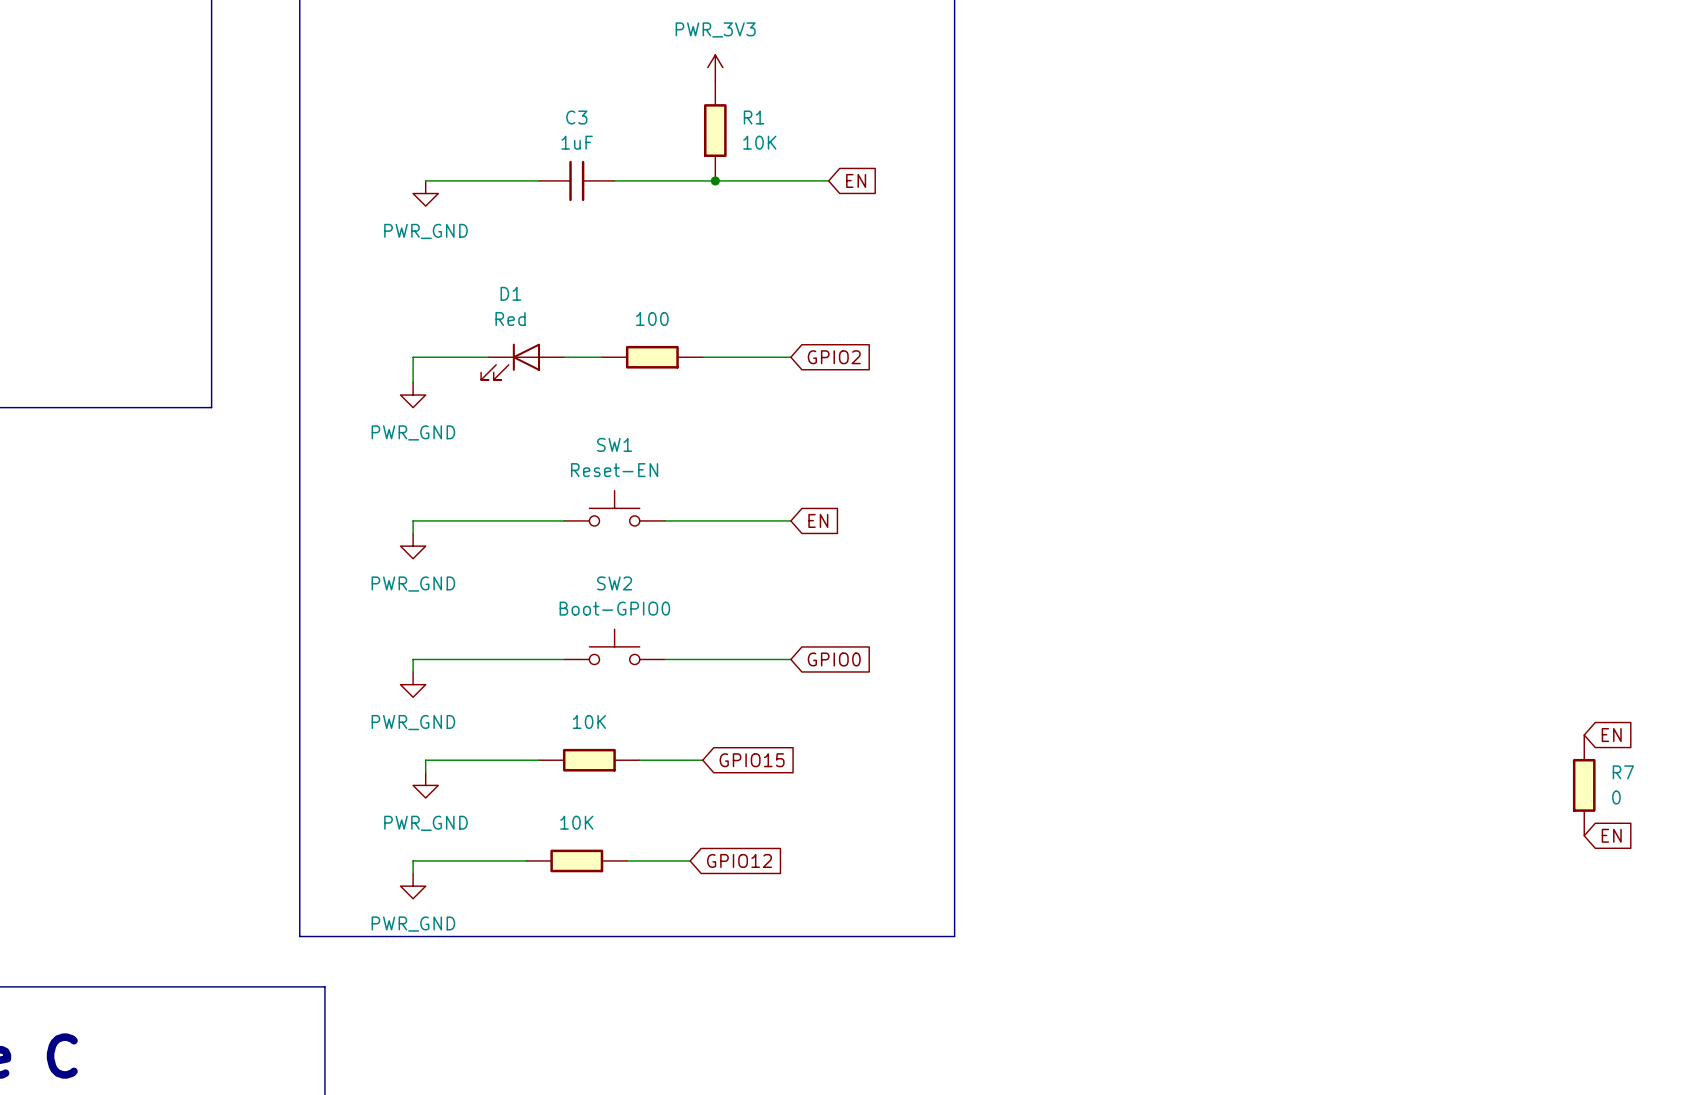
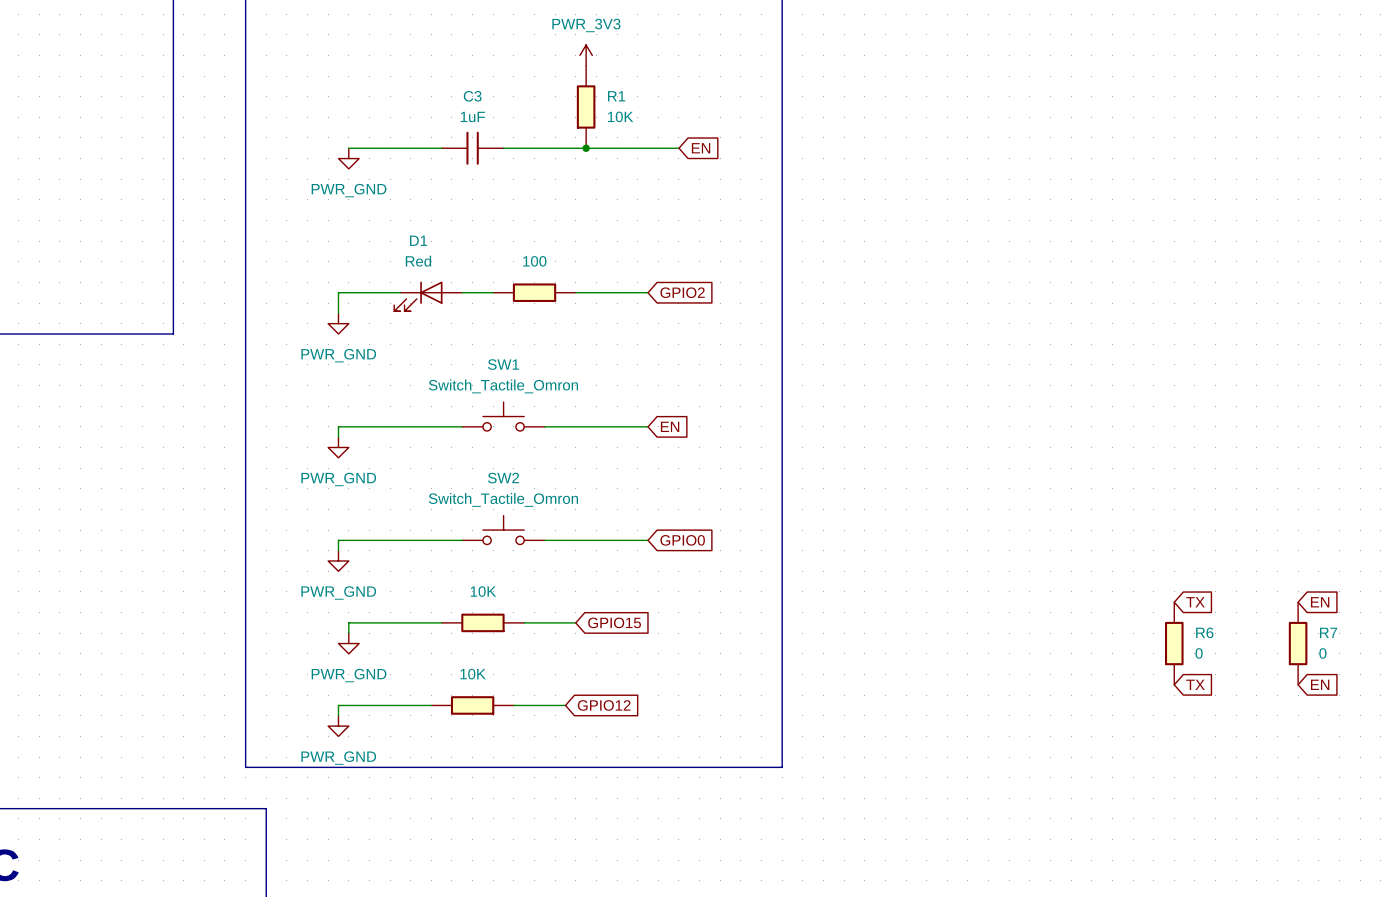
SW1 value: Reset-EN (614, 470) -> Switch_Tactile_Omron (503, 386)
SW2 value: Boot-GPIO0 (614, 608) -> Switch_Tactile_Omron (503, 499)
global label: none -> TX (1195, 602)
R6: none -> 0 (1174, 643)
global label: none -> TX (1195, 684)

